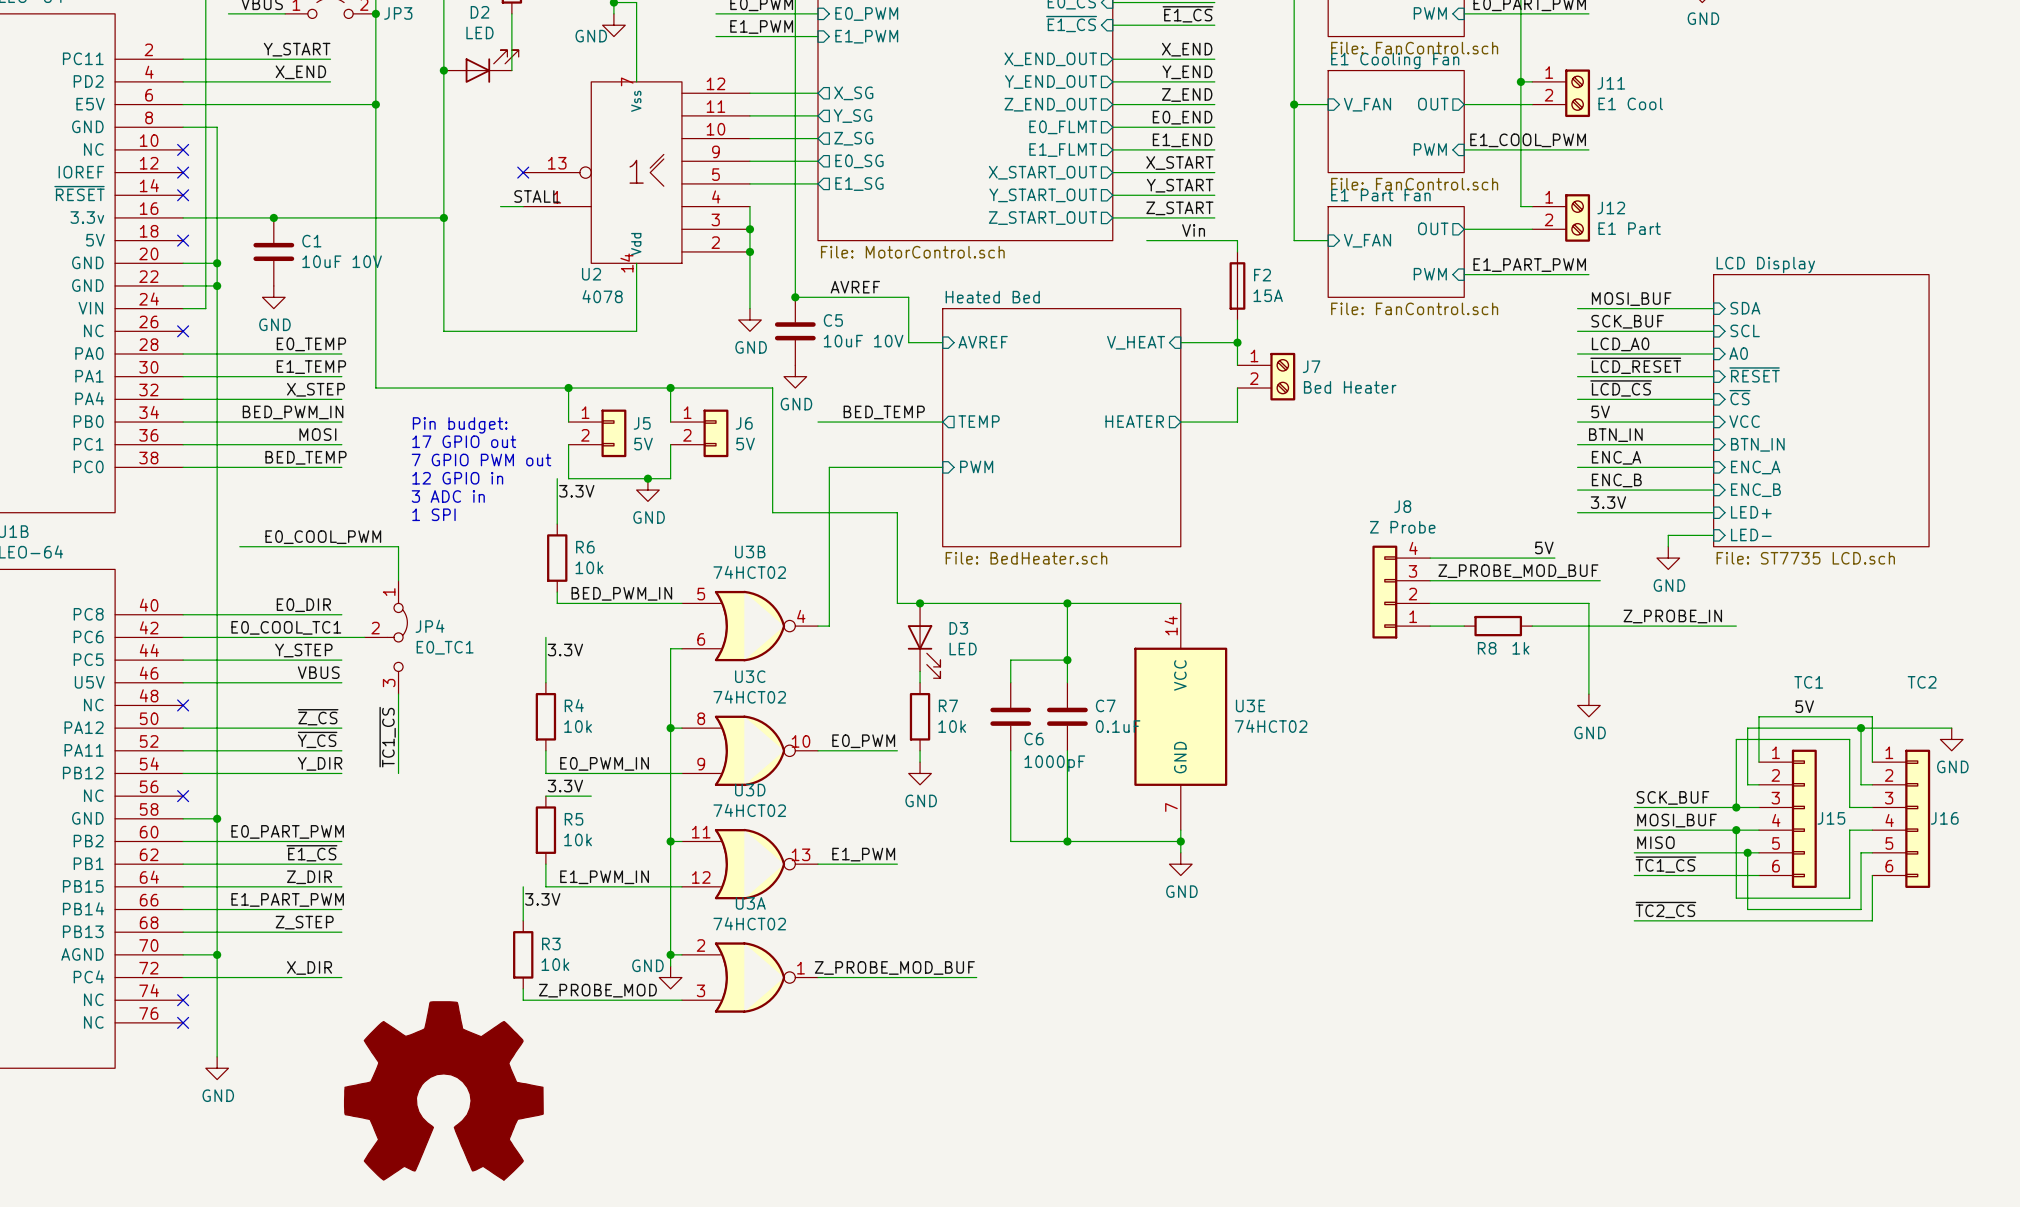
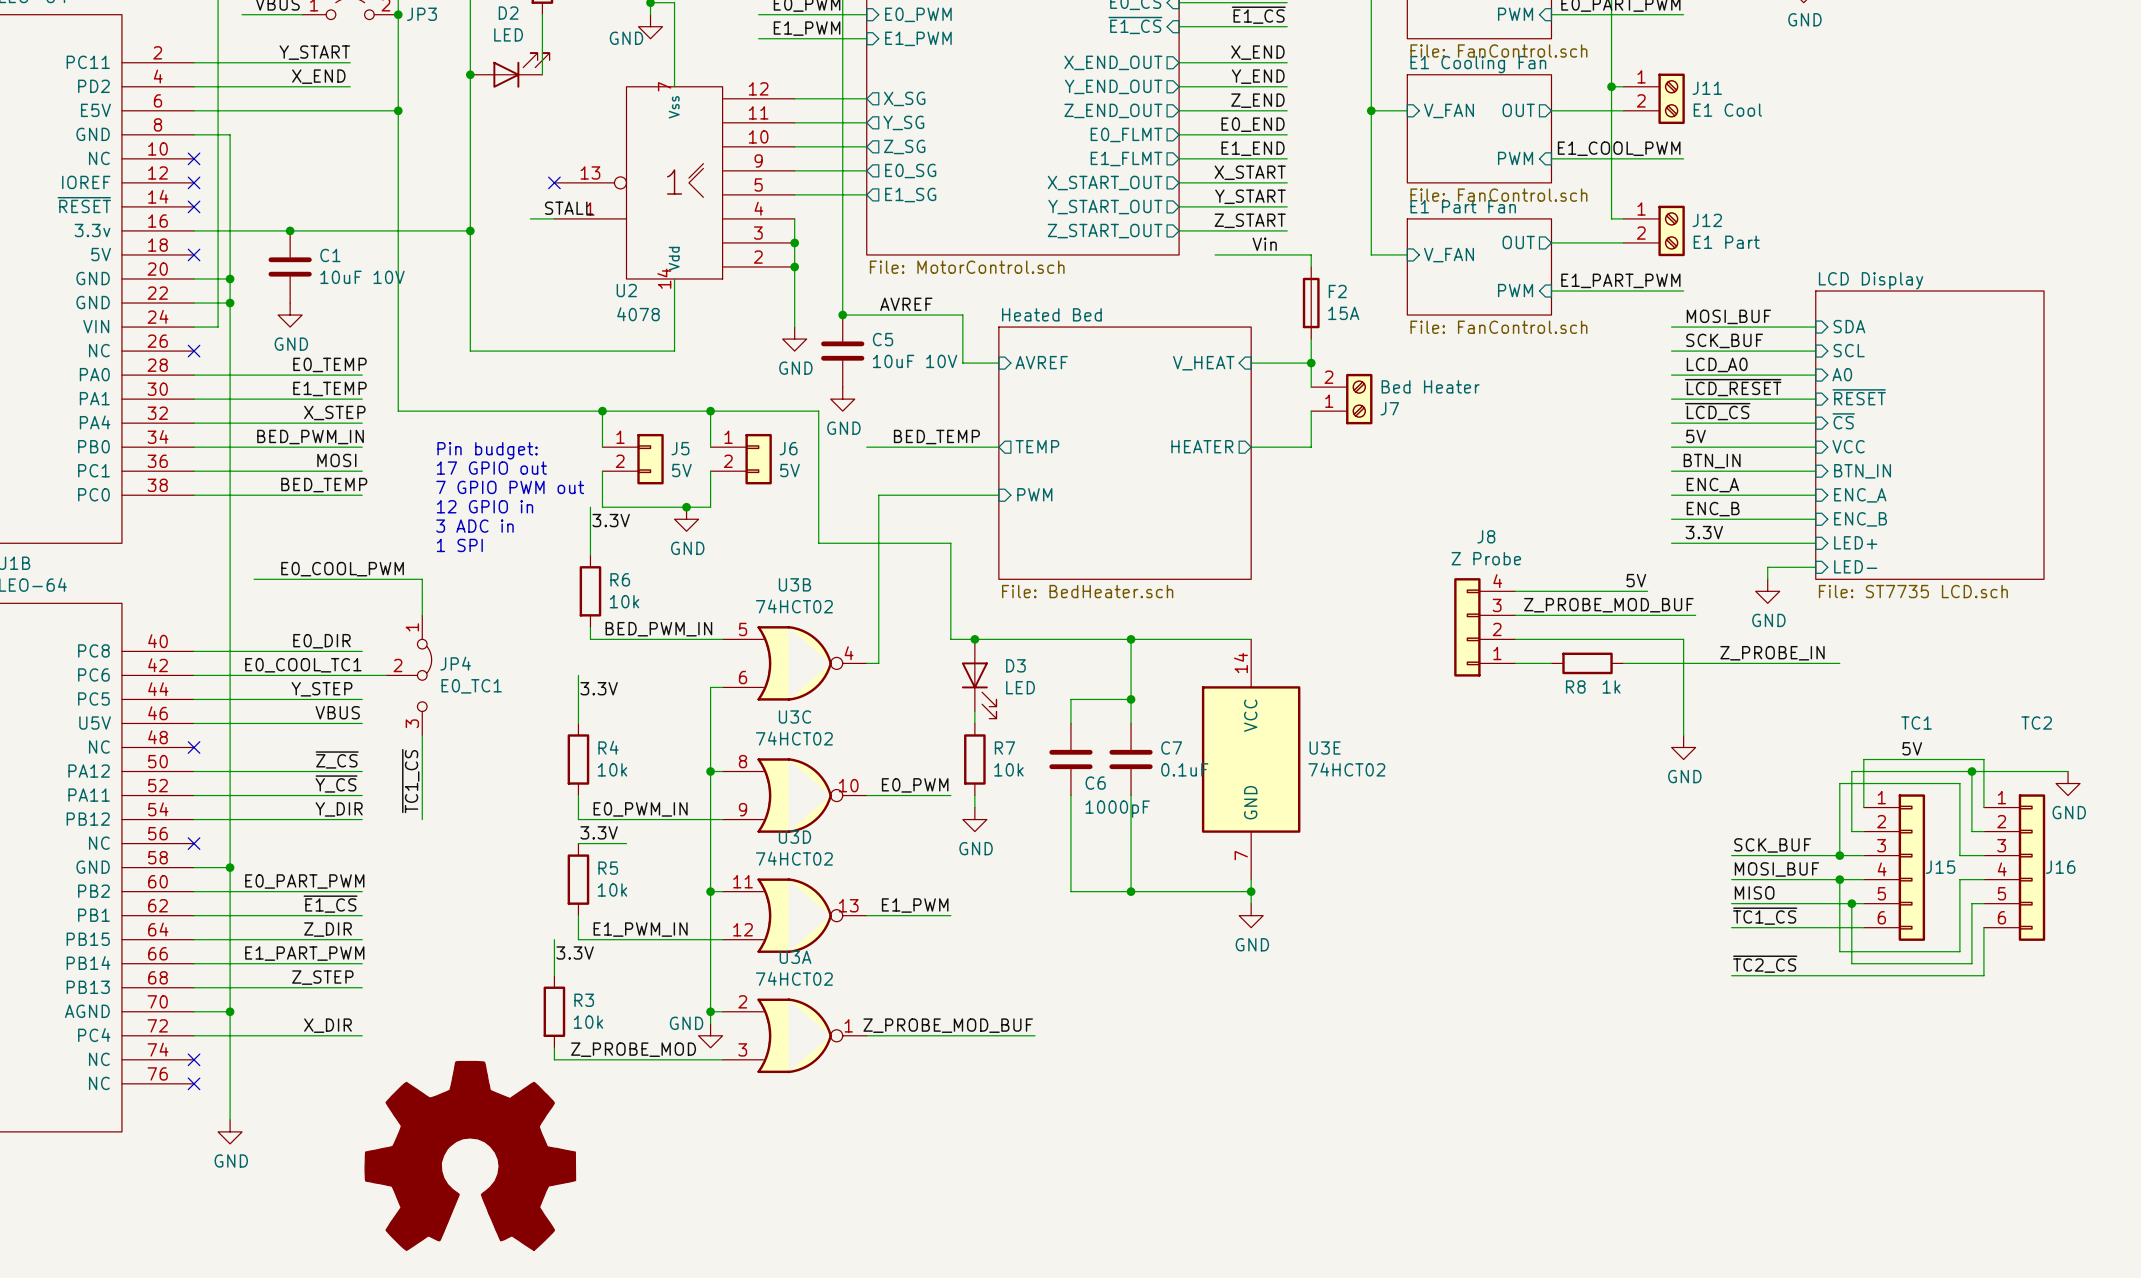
J7 flip: as is (1282, 376) -> up-down (1359, 399)

